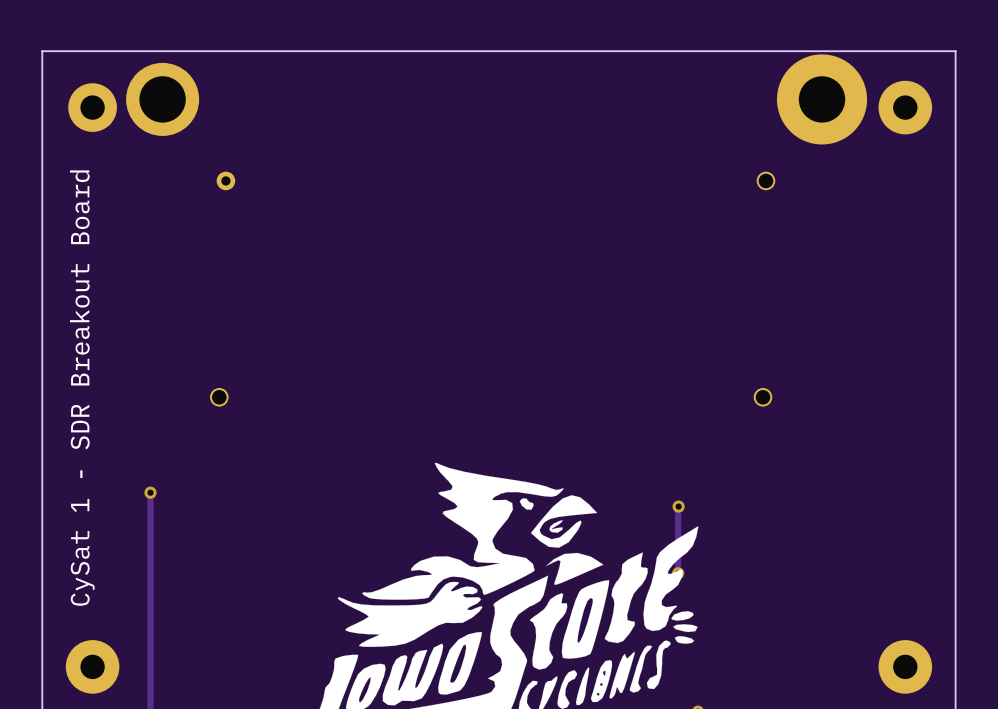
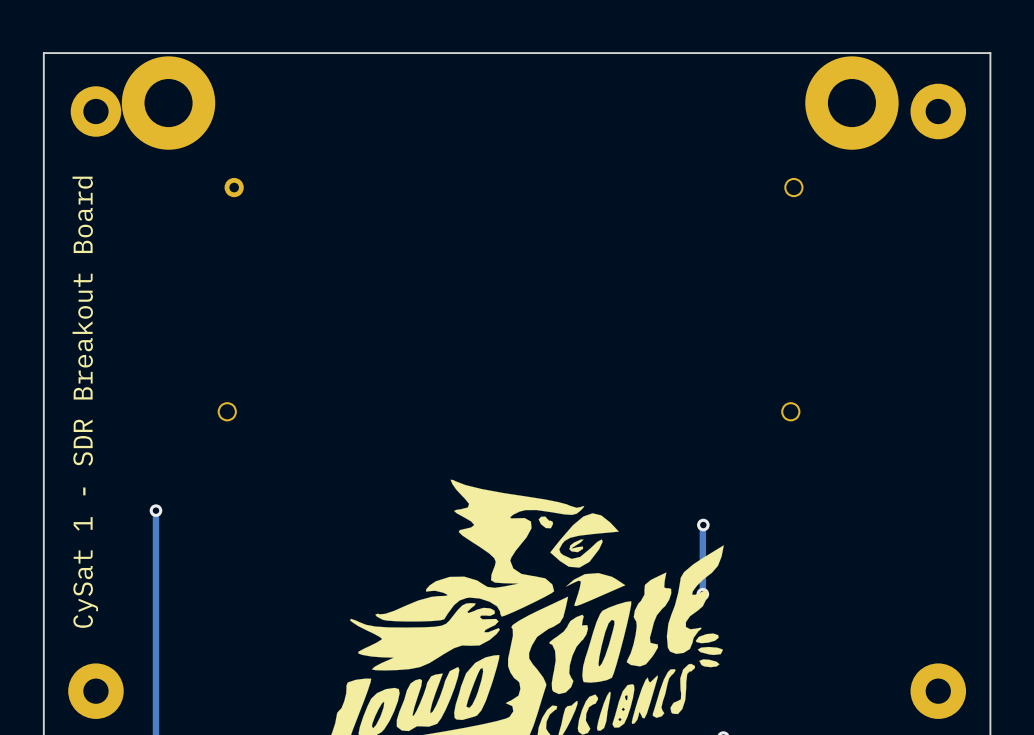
part footprint: [126, 62, 200, 136] -> [121, 56, 216, 150]

